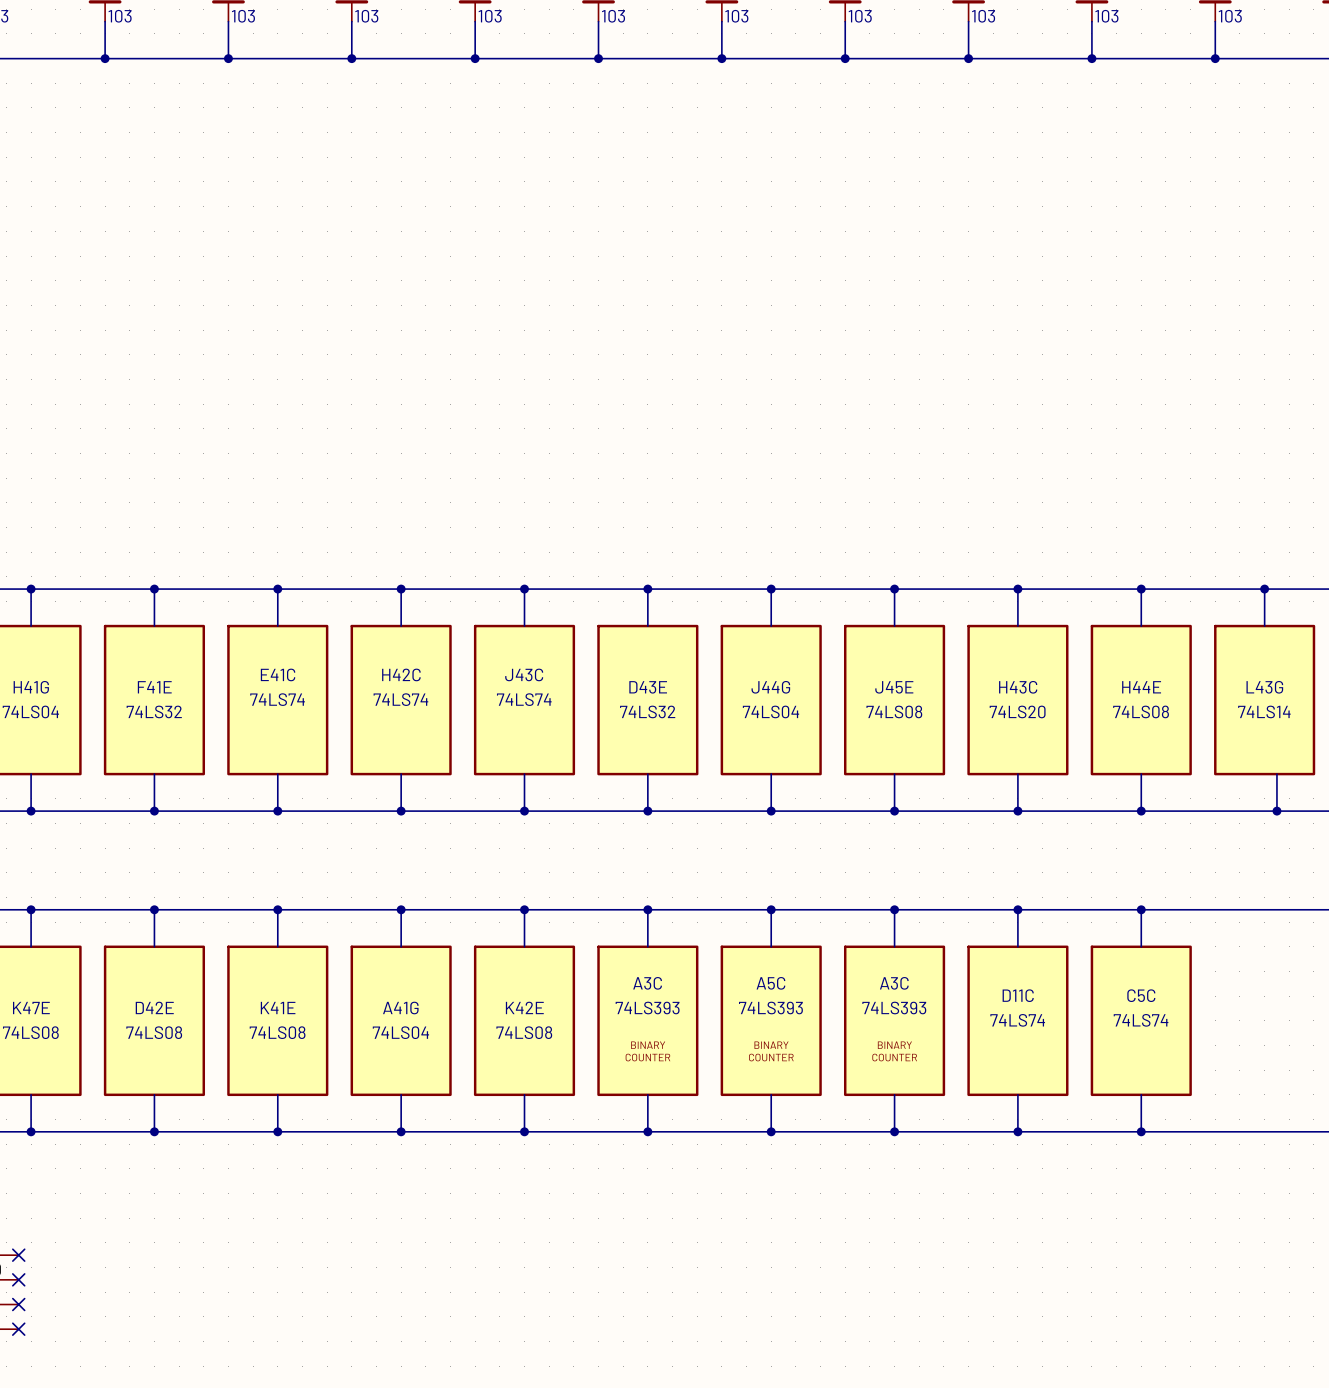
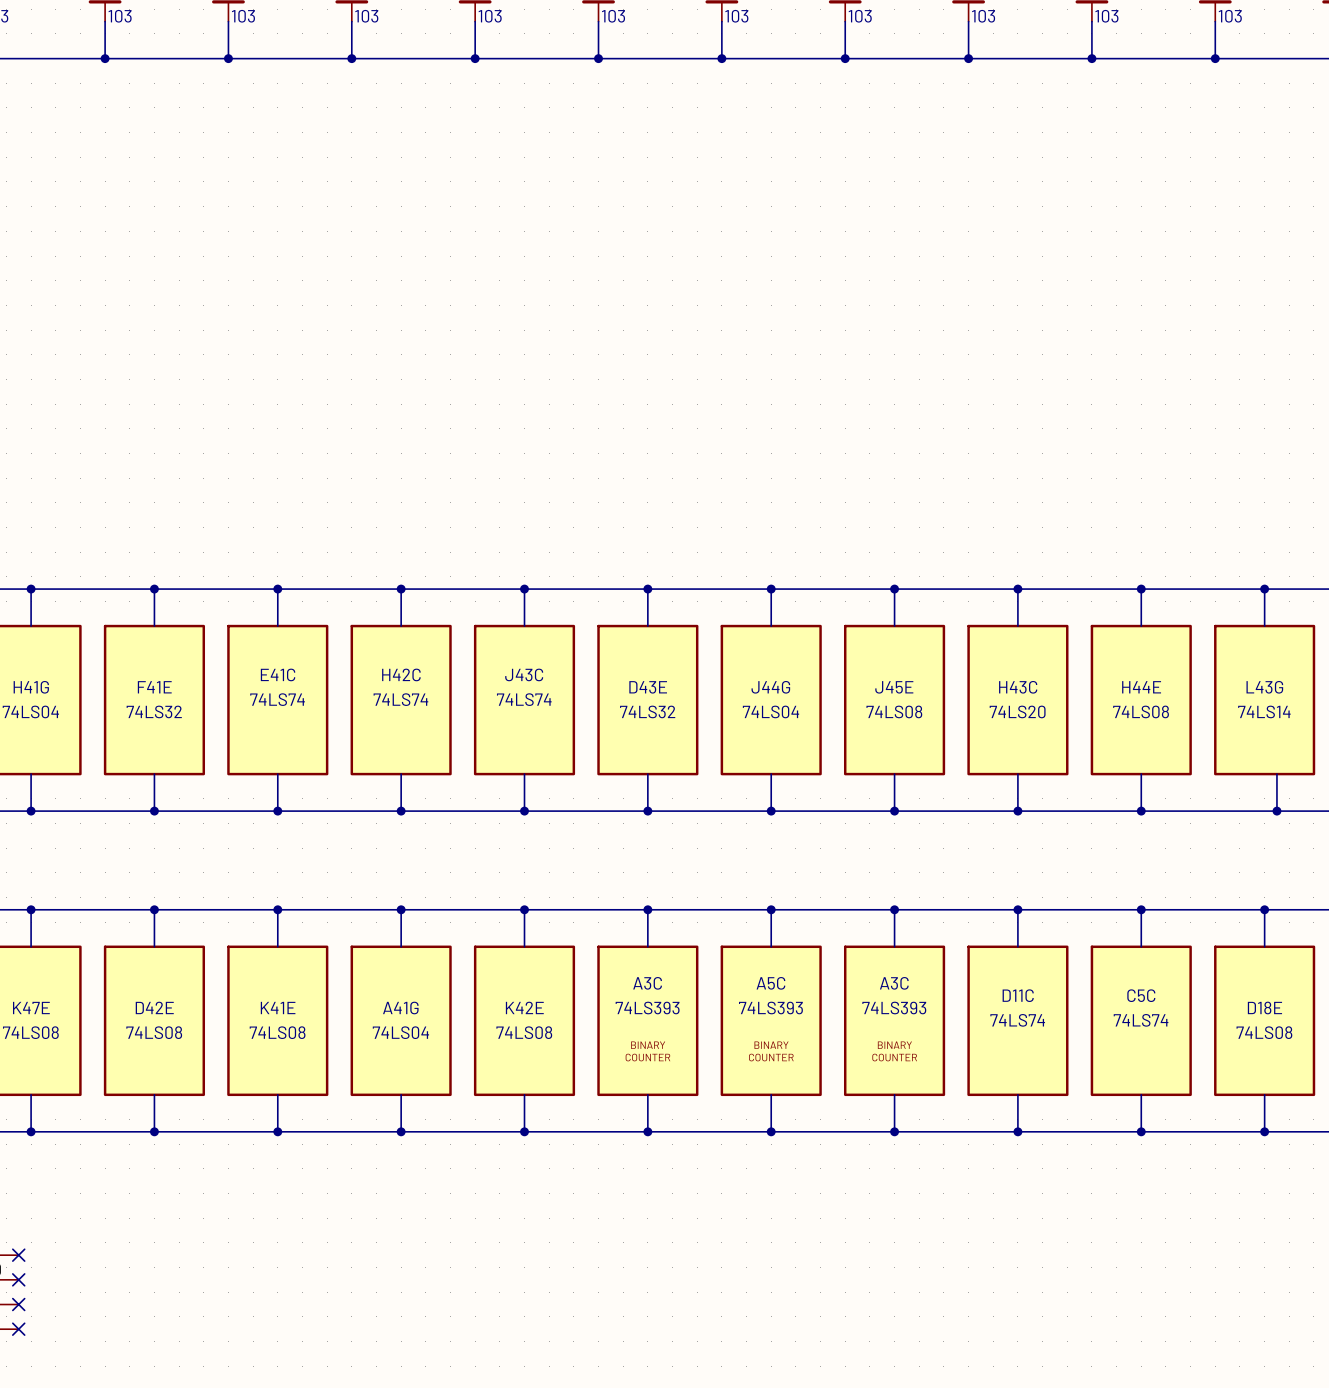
wire: none -> (1264, 909) (1264, 946)
junction: none -> (1264, 909)
D18E: none -> 74LS08 (1264, 1020)
wire: none -> (1264, 1094) (1264, 1131)
junction: none -> (1264, 1131)

